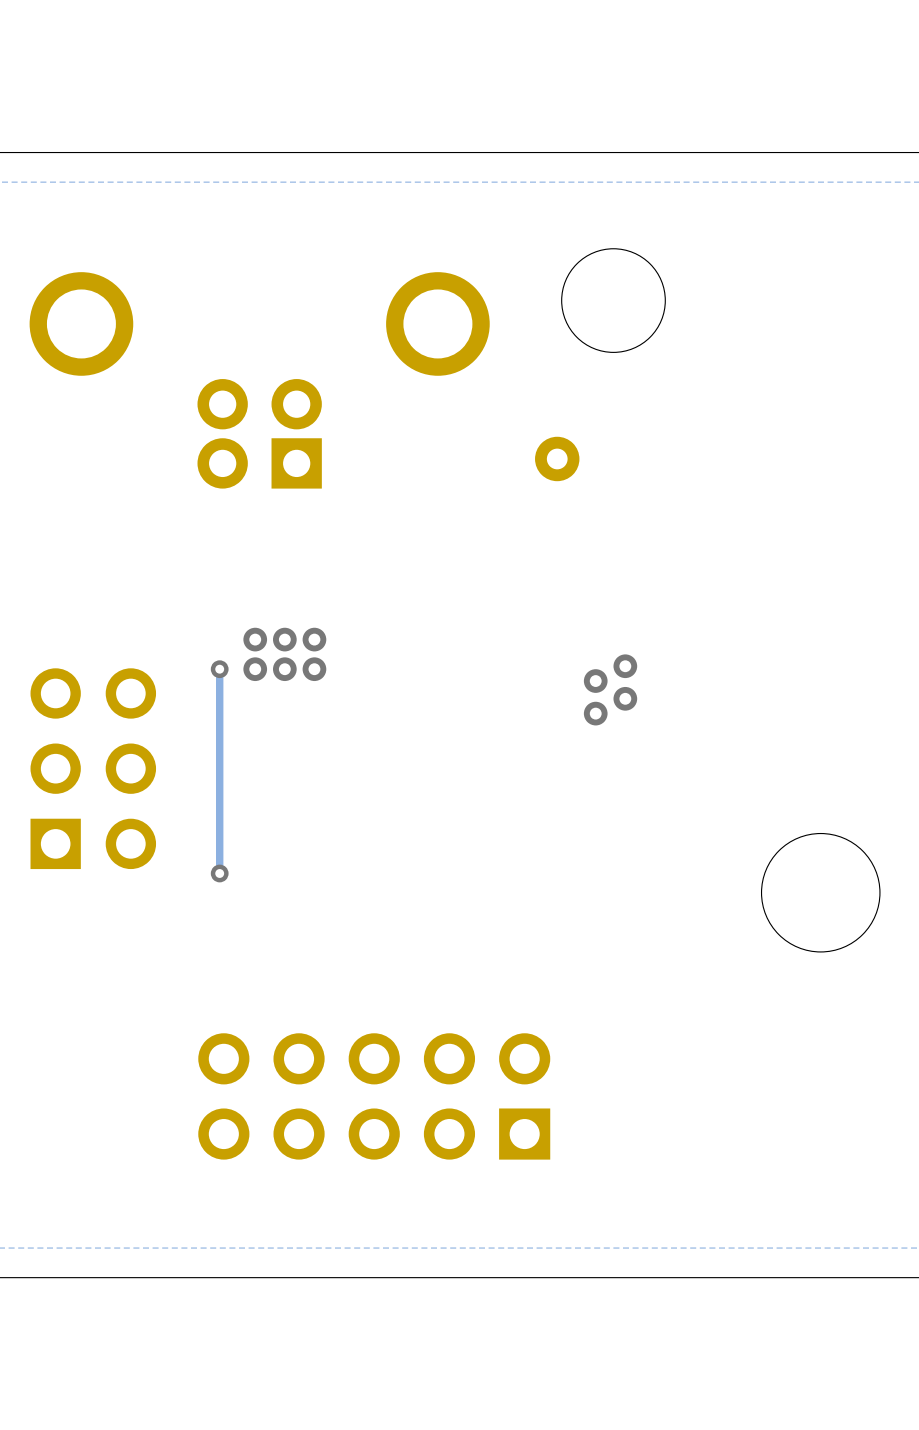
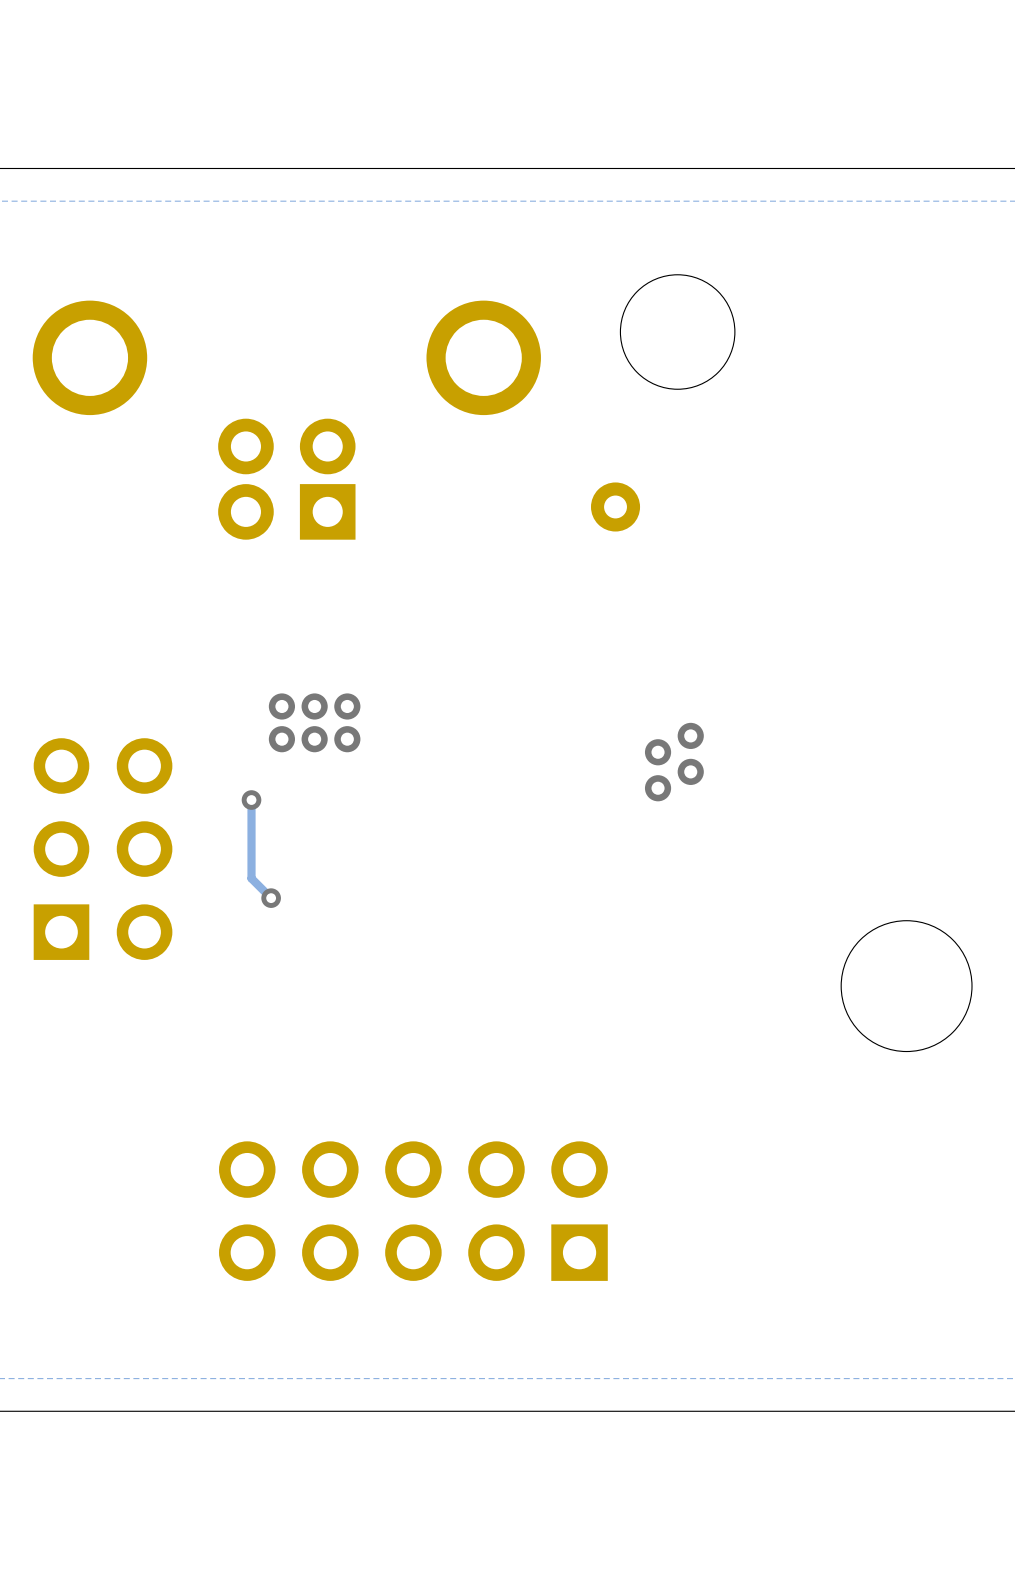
track: (219, 669) (219, 873) -> none
via position: (219, 669) -> (251, 800)
track: none -> (251, 800) (251, 878) (271, 898)
via position: (219, 873) -> (271, 898)

